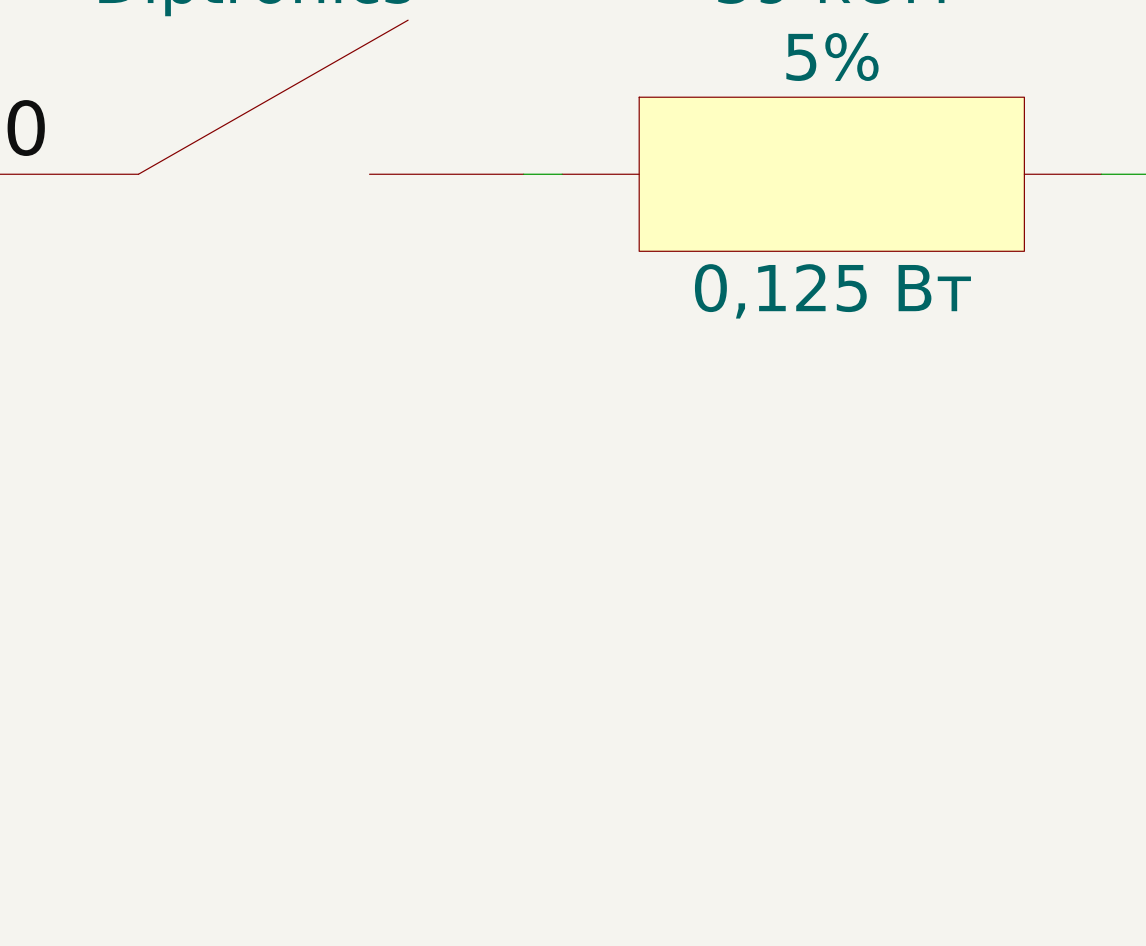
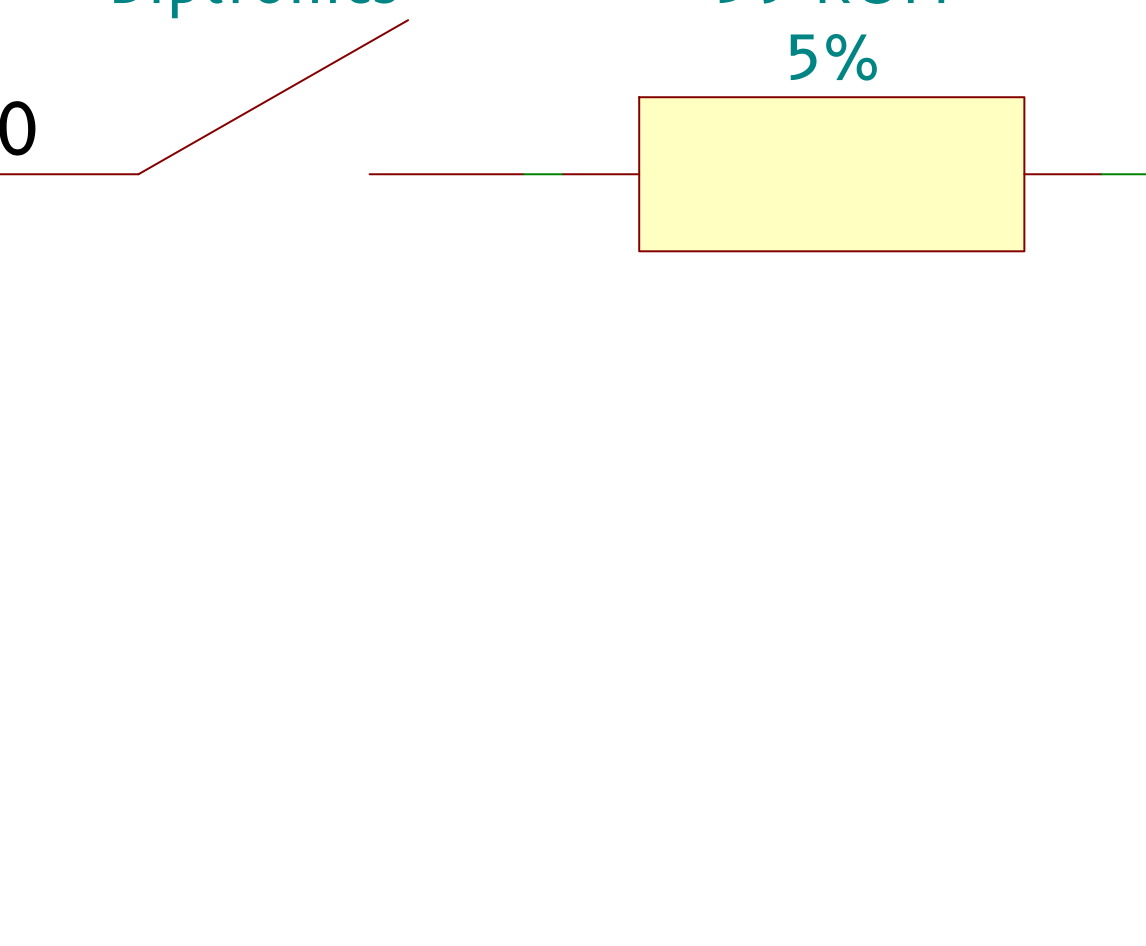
part text: 0,125 Вт (832, 291) -> none

